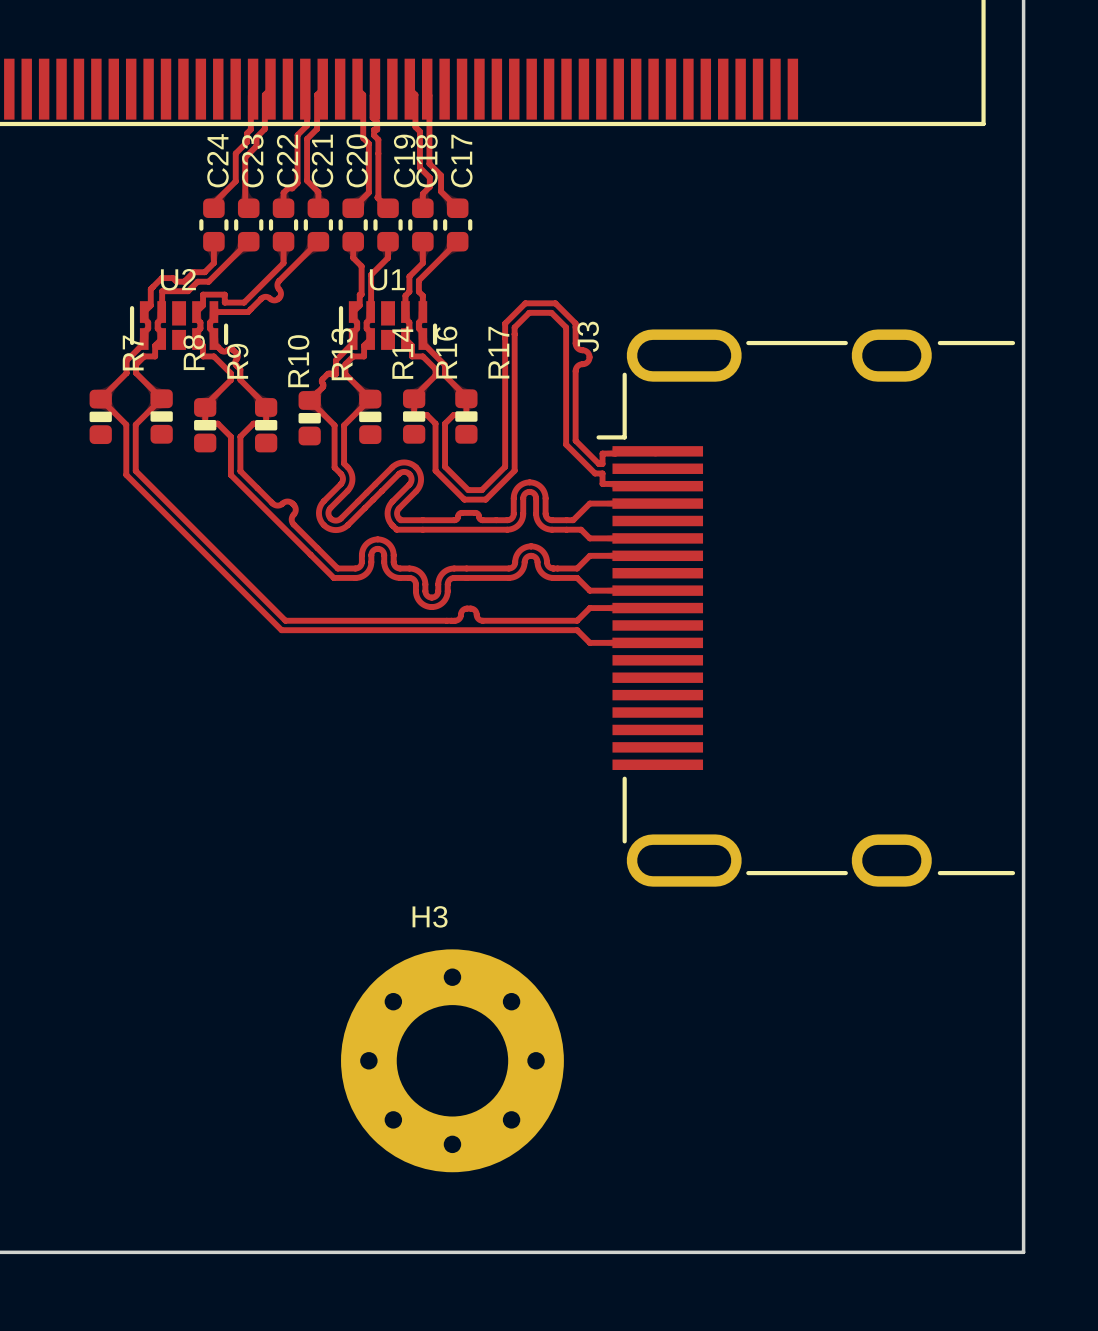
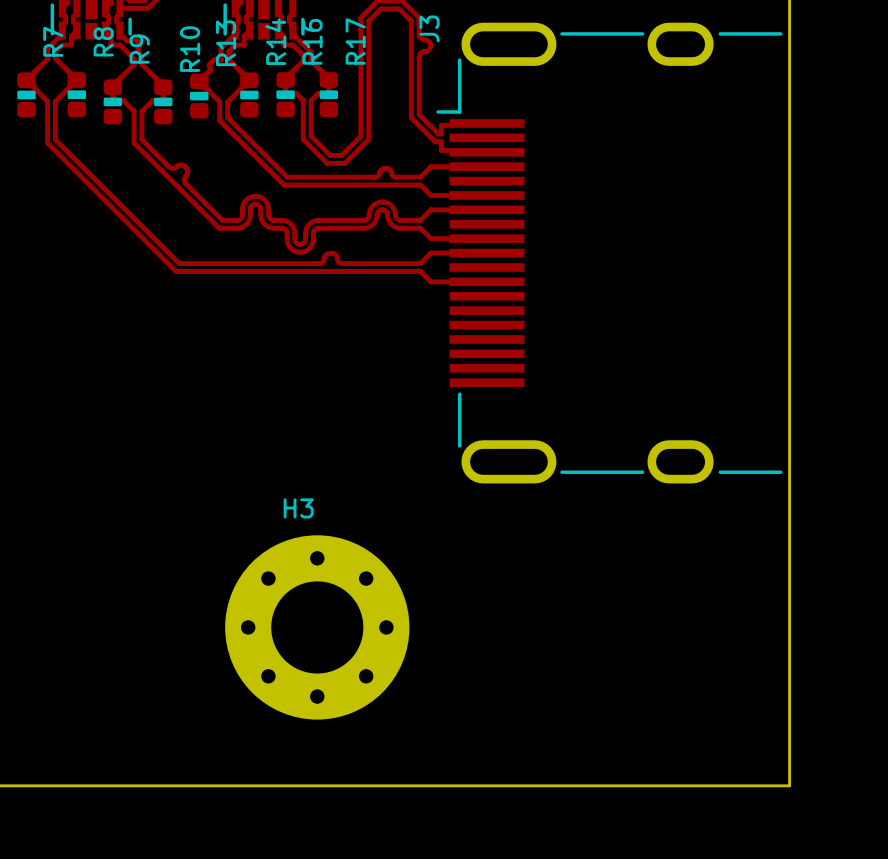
track: (344, 444) (344, 463) (351, 472) (352, 481) (348, 489) (329, 509) (328, 515) (333, 520) (341, 518) (393, 465) (404, 462) (416, 467) (421, 479) (417, 489) (397, 510) (397, 515) (400, 520) (454, 520) (461, 512) (476, 513) (482, 520) (508, 519) (513, 515) (515, 491) (521, 484) (529, 482) (538, 484) (544, 491) (545, 514) (548, 518) (573, 520) (577, 516) -> (227, 117) (287, 177) (376, 177) (384, 168) (389, 169) (394, 177) (420, 177)
track: (334, 448) (334, 467) (341, 475) (342, 480) (322, 502) (318, 513) (322, 523) (331, 529) (338, 529) (346, 526) (398, 474) (404, 471) (410, 475) (410, 482) (391, 503) (387, 511) (388, 519) (396, 529) (510, 529) (517, 526) (521, 520) (523, 496) (529, 491) (535, 495) (536, 517) (542, 526) (550, 529) (581, 529) -> (219, 120) (284, 184) (420, 184) (423, 188)

